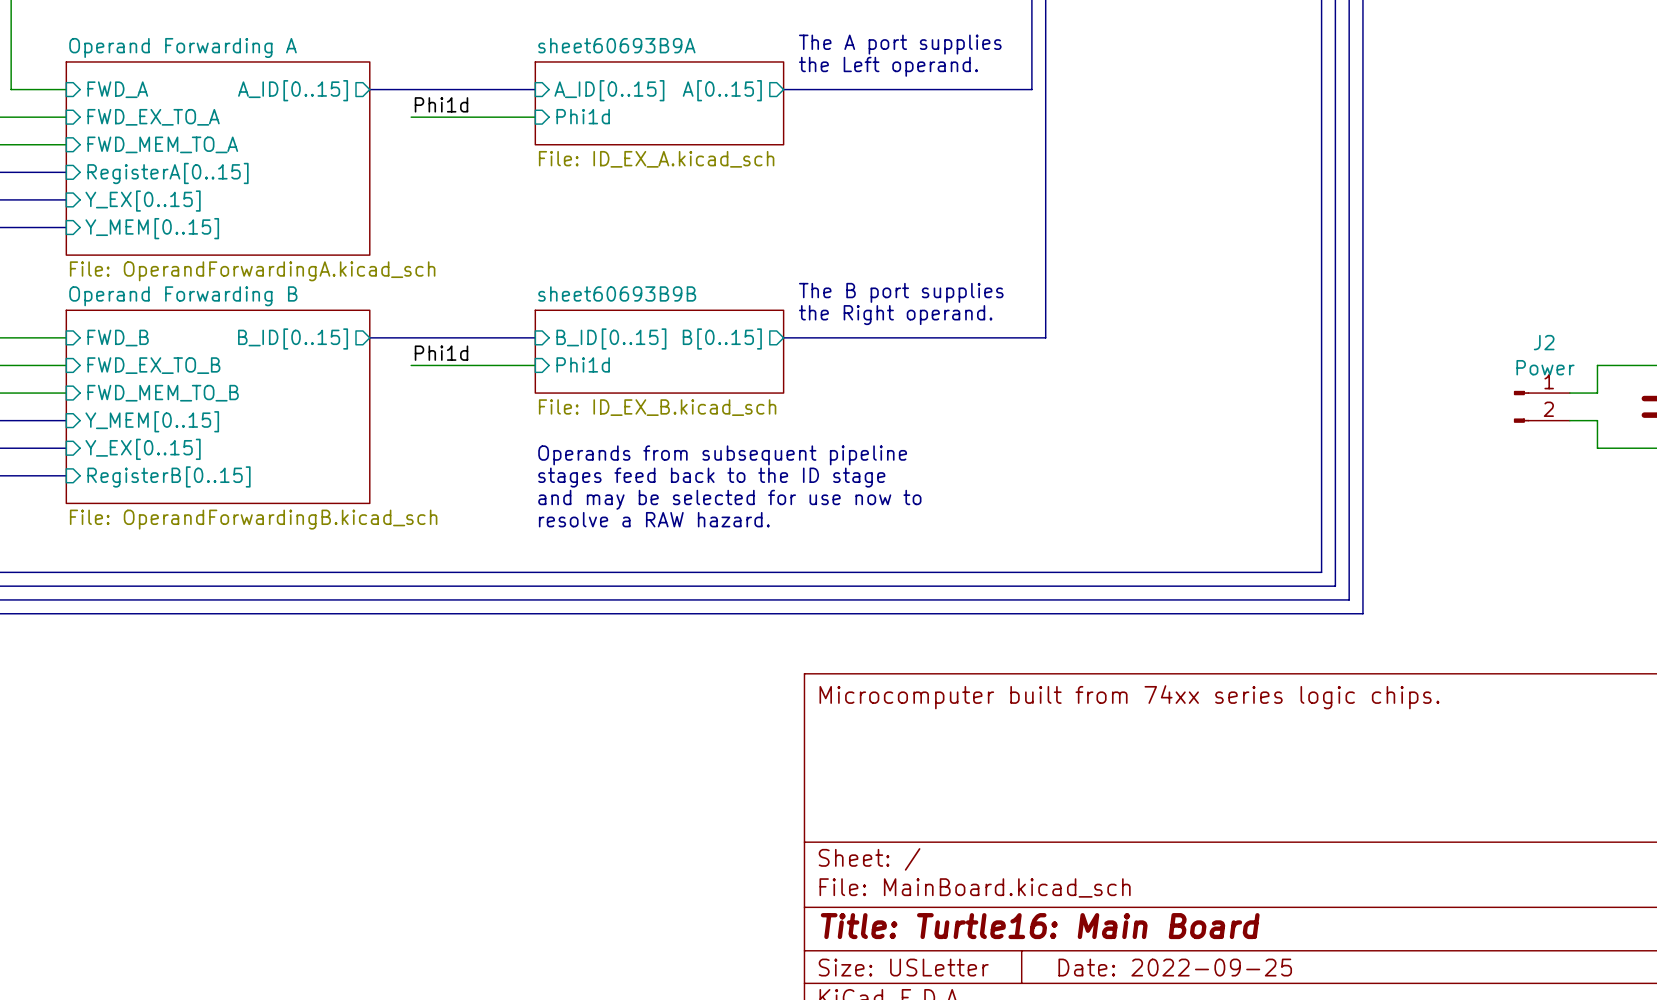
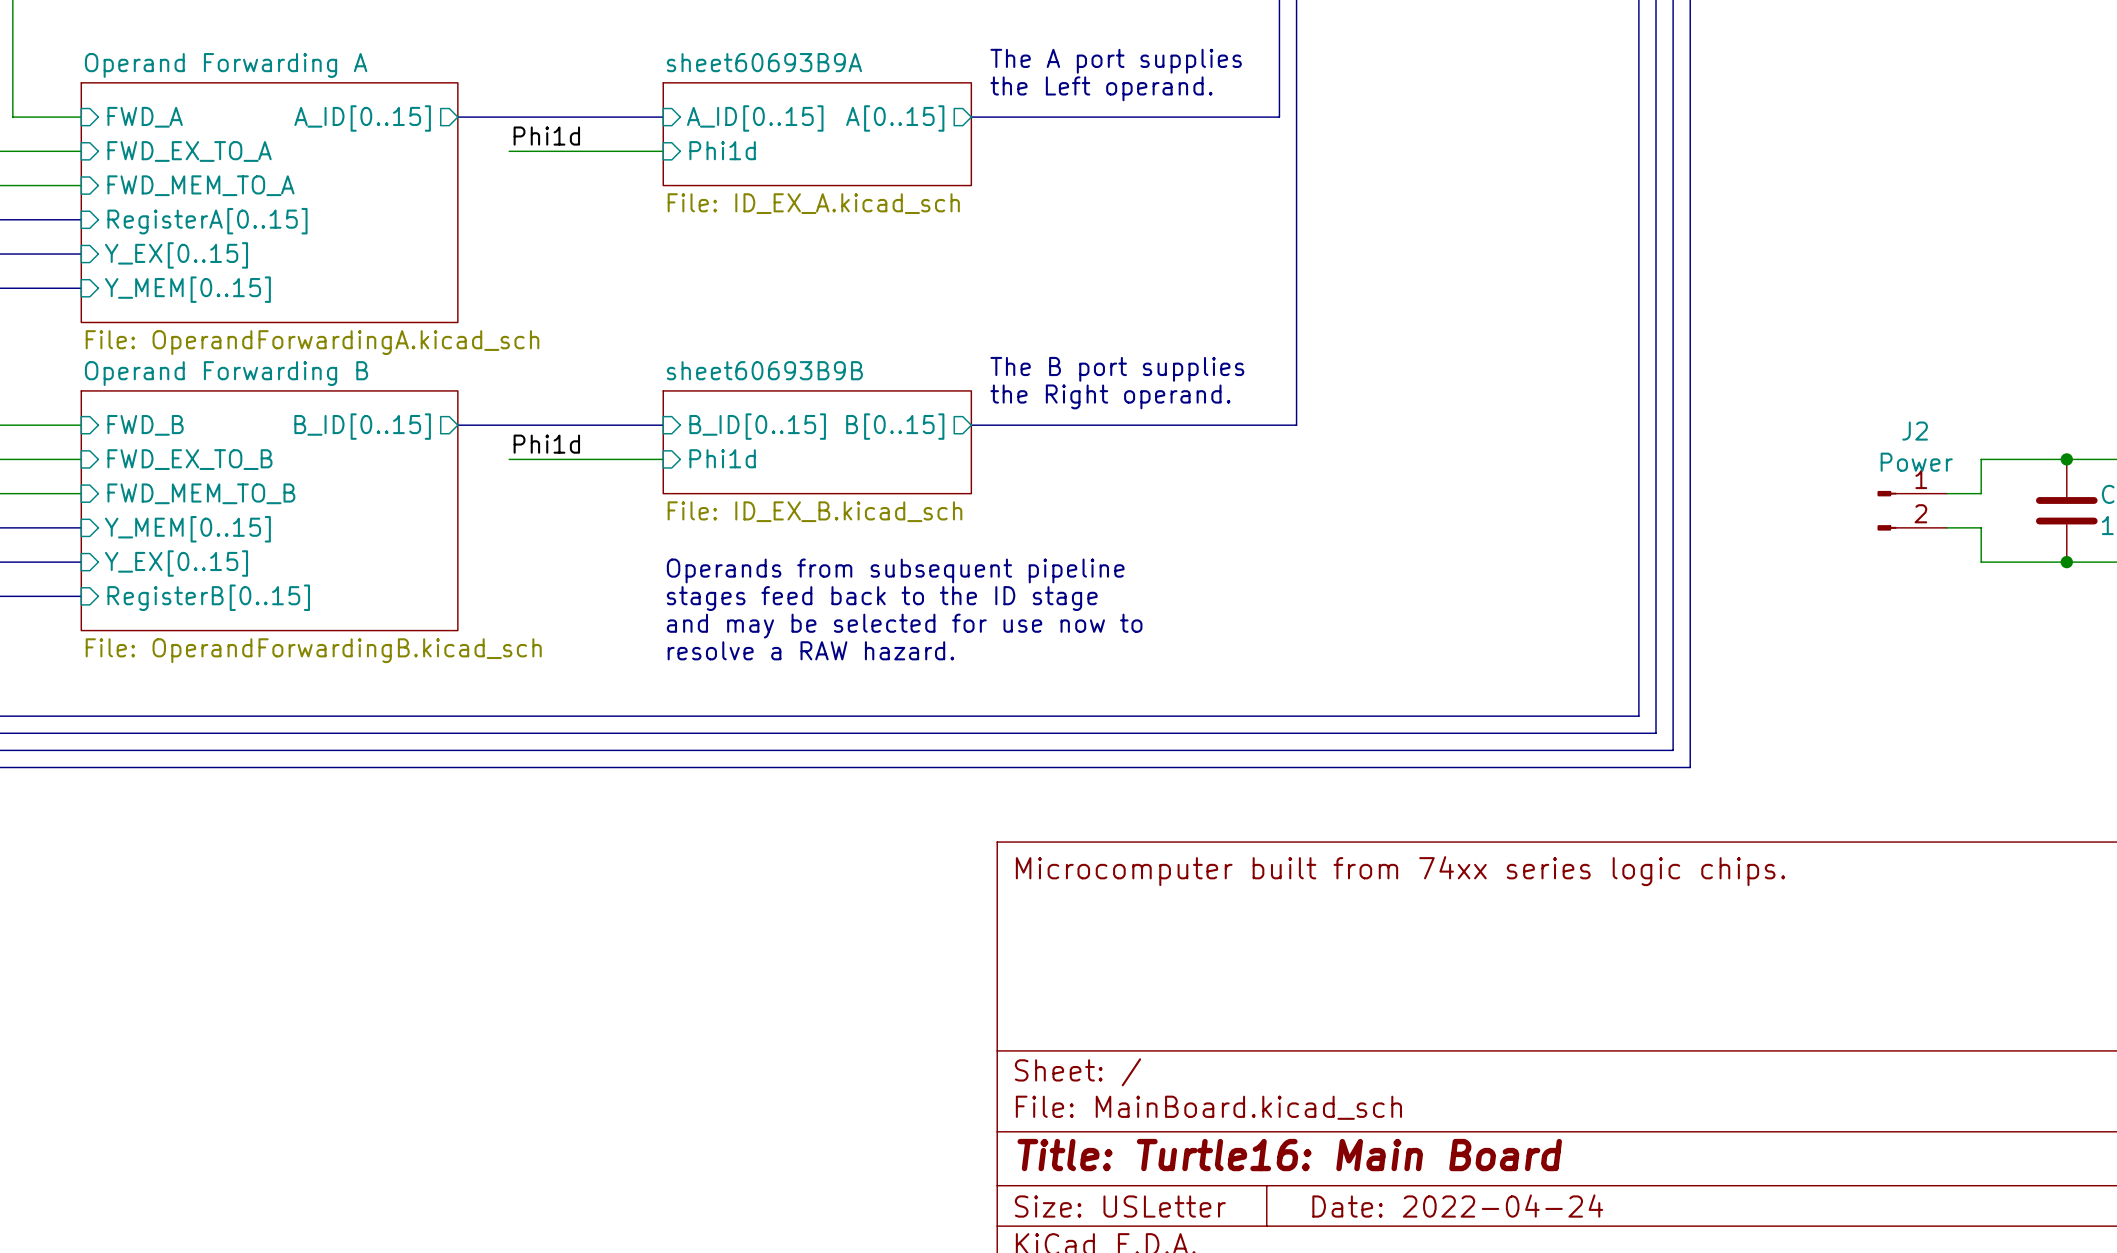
title block: Date: 2022-09-25 (1175, 967) -> Date: 2022-04-24 (1457, 1206)

